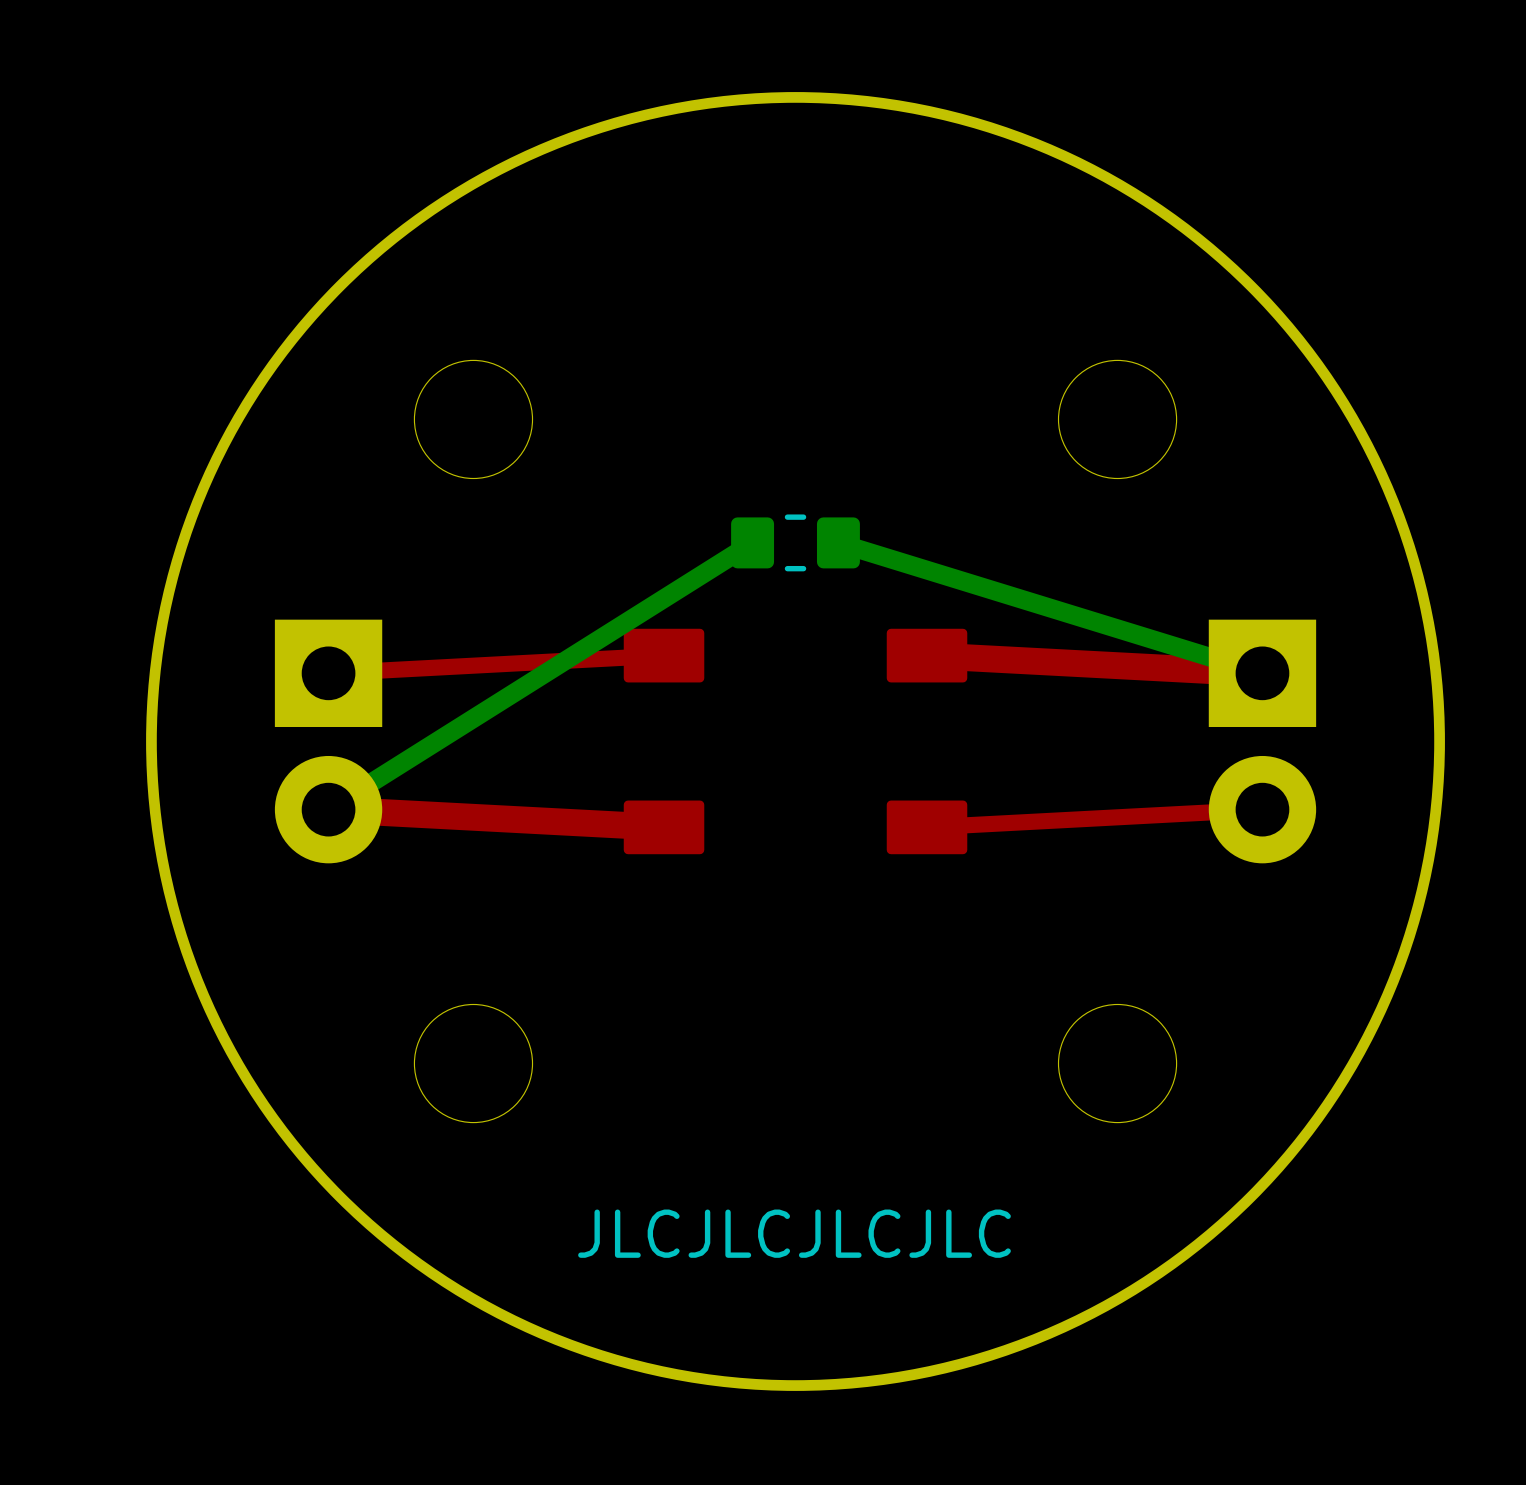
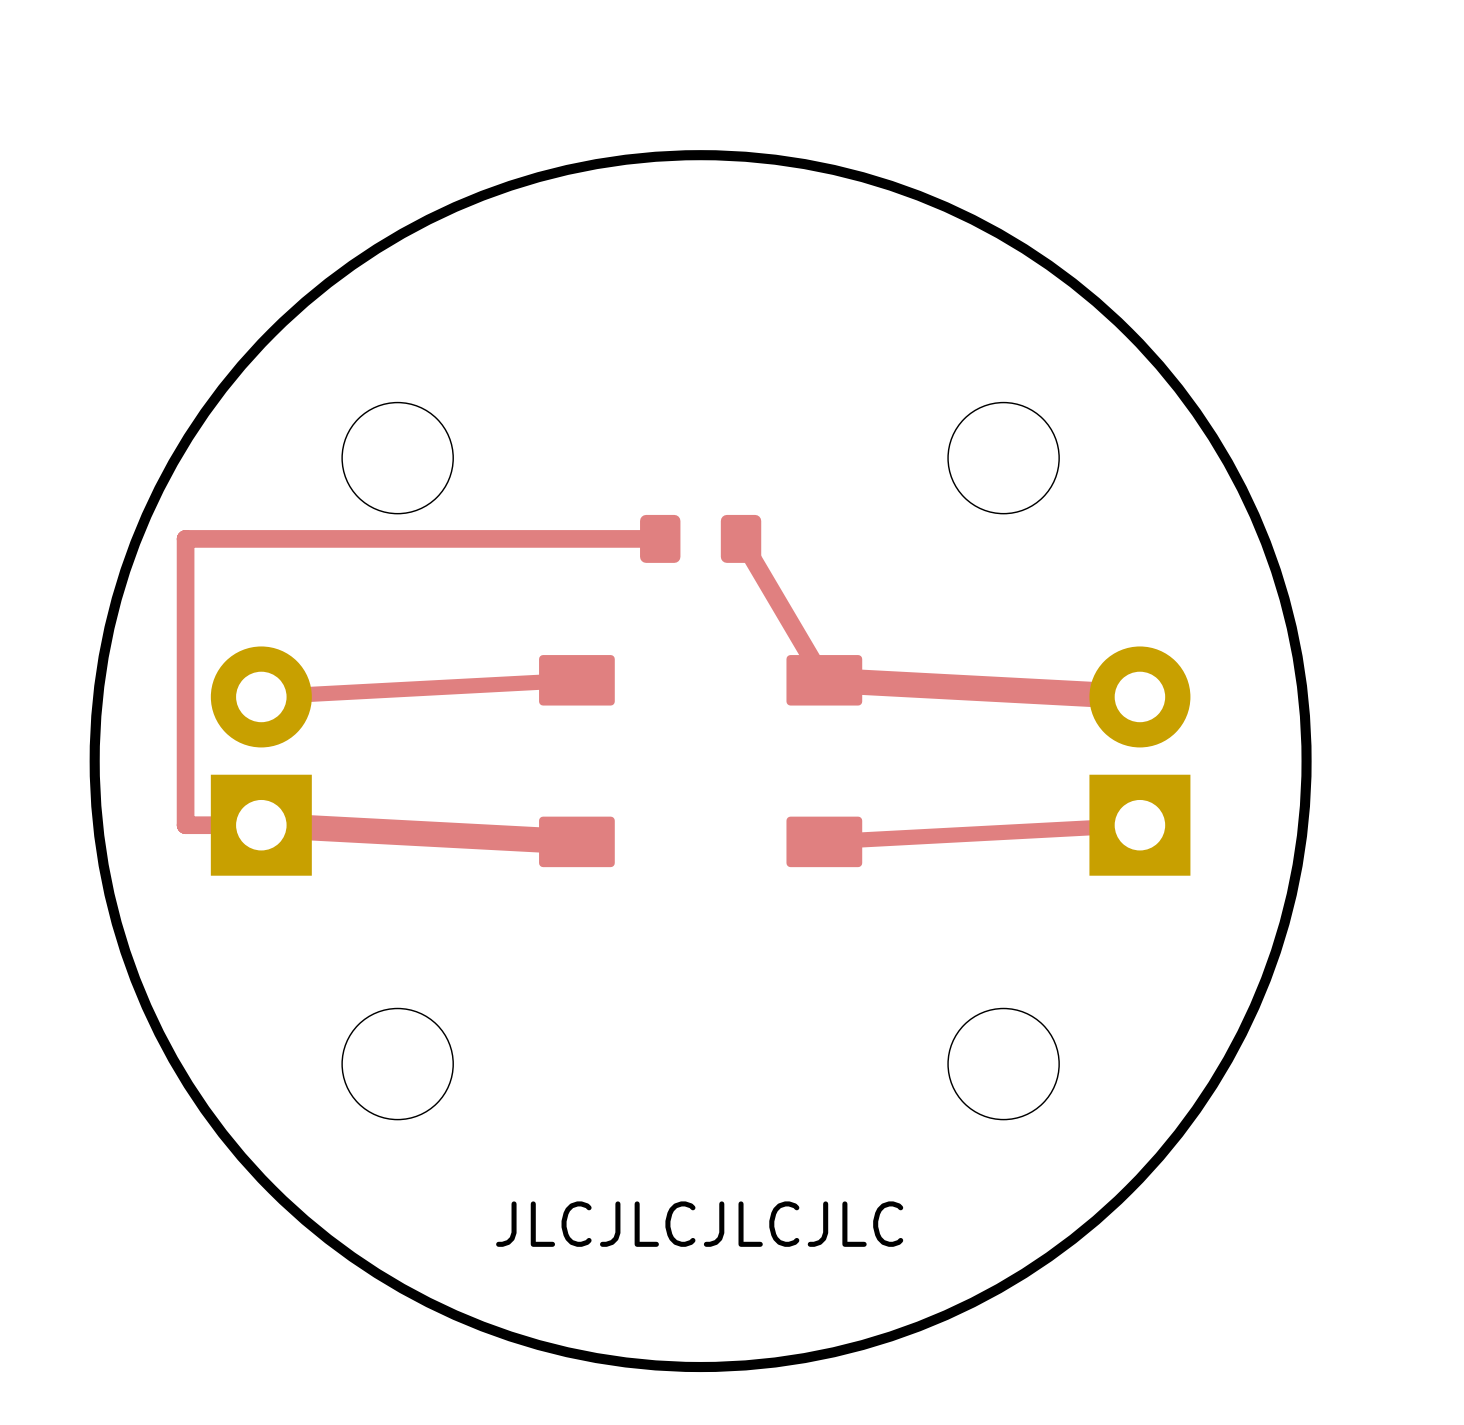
top track: none -> (660, 538) (185, 538) (185, 825) (261, 825)
top track: none -> (741, 538) (824, 680)
bottom track: (752, 542) (328, 809) -> none
part side: bottom (795, 542) -> top (700, 538)
bottom track: (838, 542) (1262, 673) -> none
part rotation: 0° (328, 741) -> 180° (261, 761)
part rotation: 0° (1262, 741) -> 180° (1139, 761)

